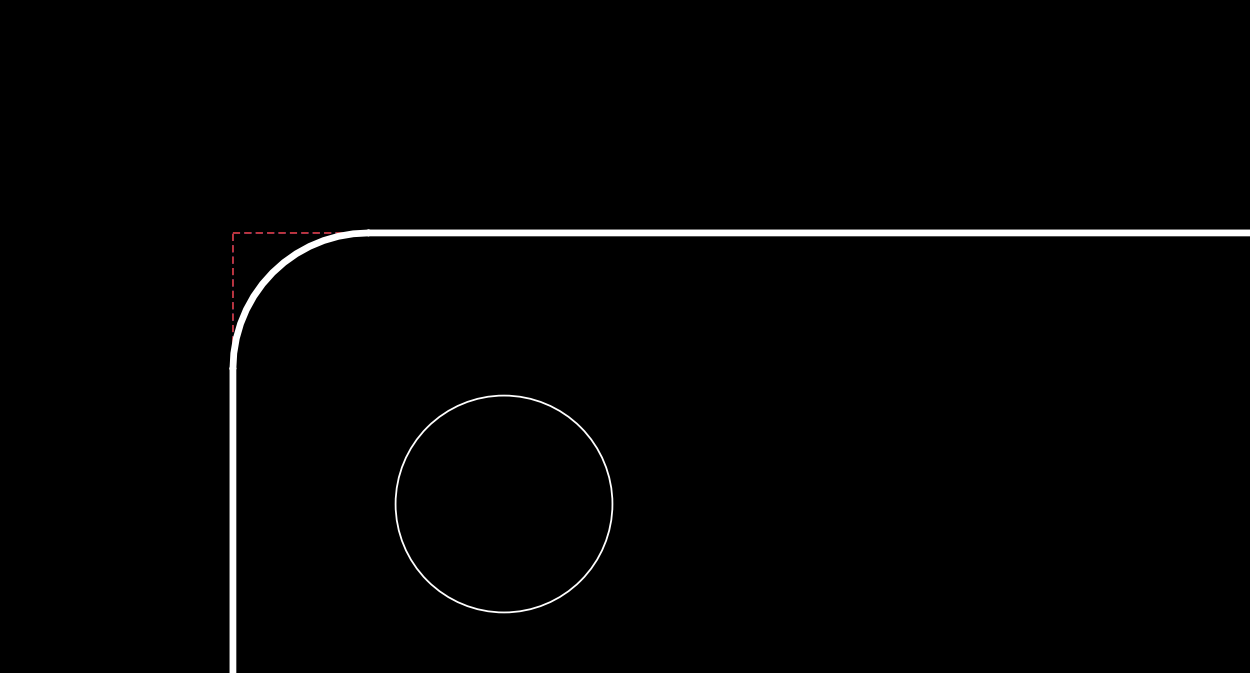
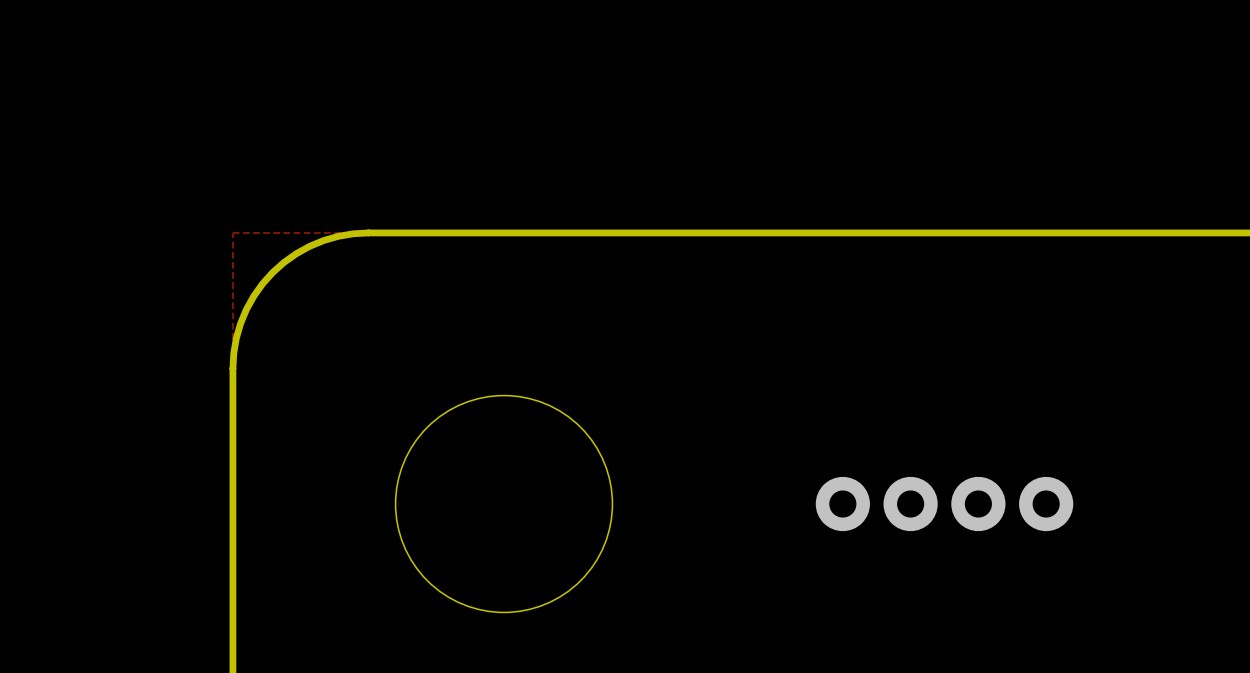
via: none -> (842, 504)
via: none -> (910, 504)
via: none -> (978, 504)
via: none -> (1046, 504)

